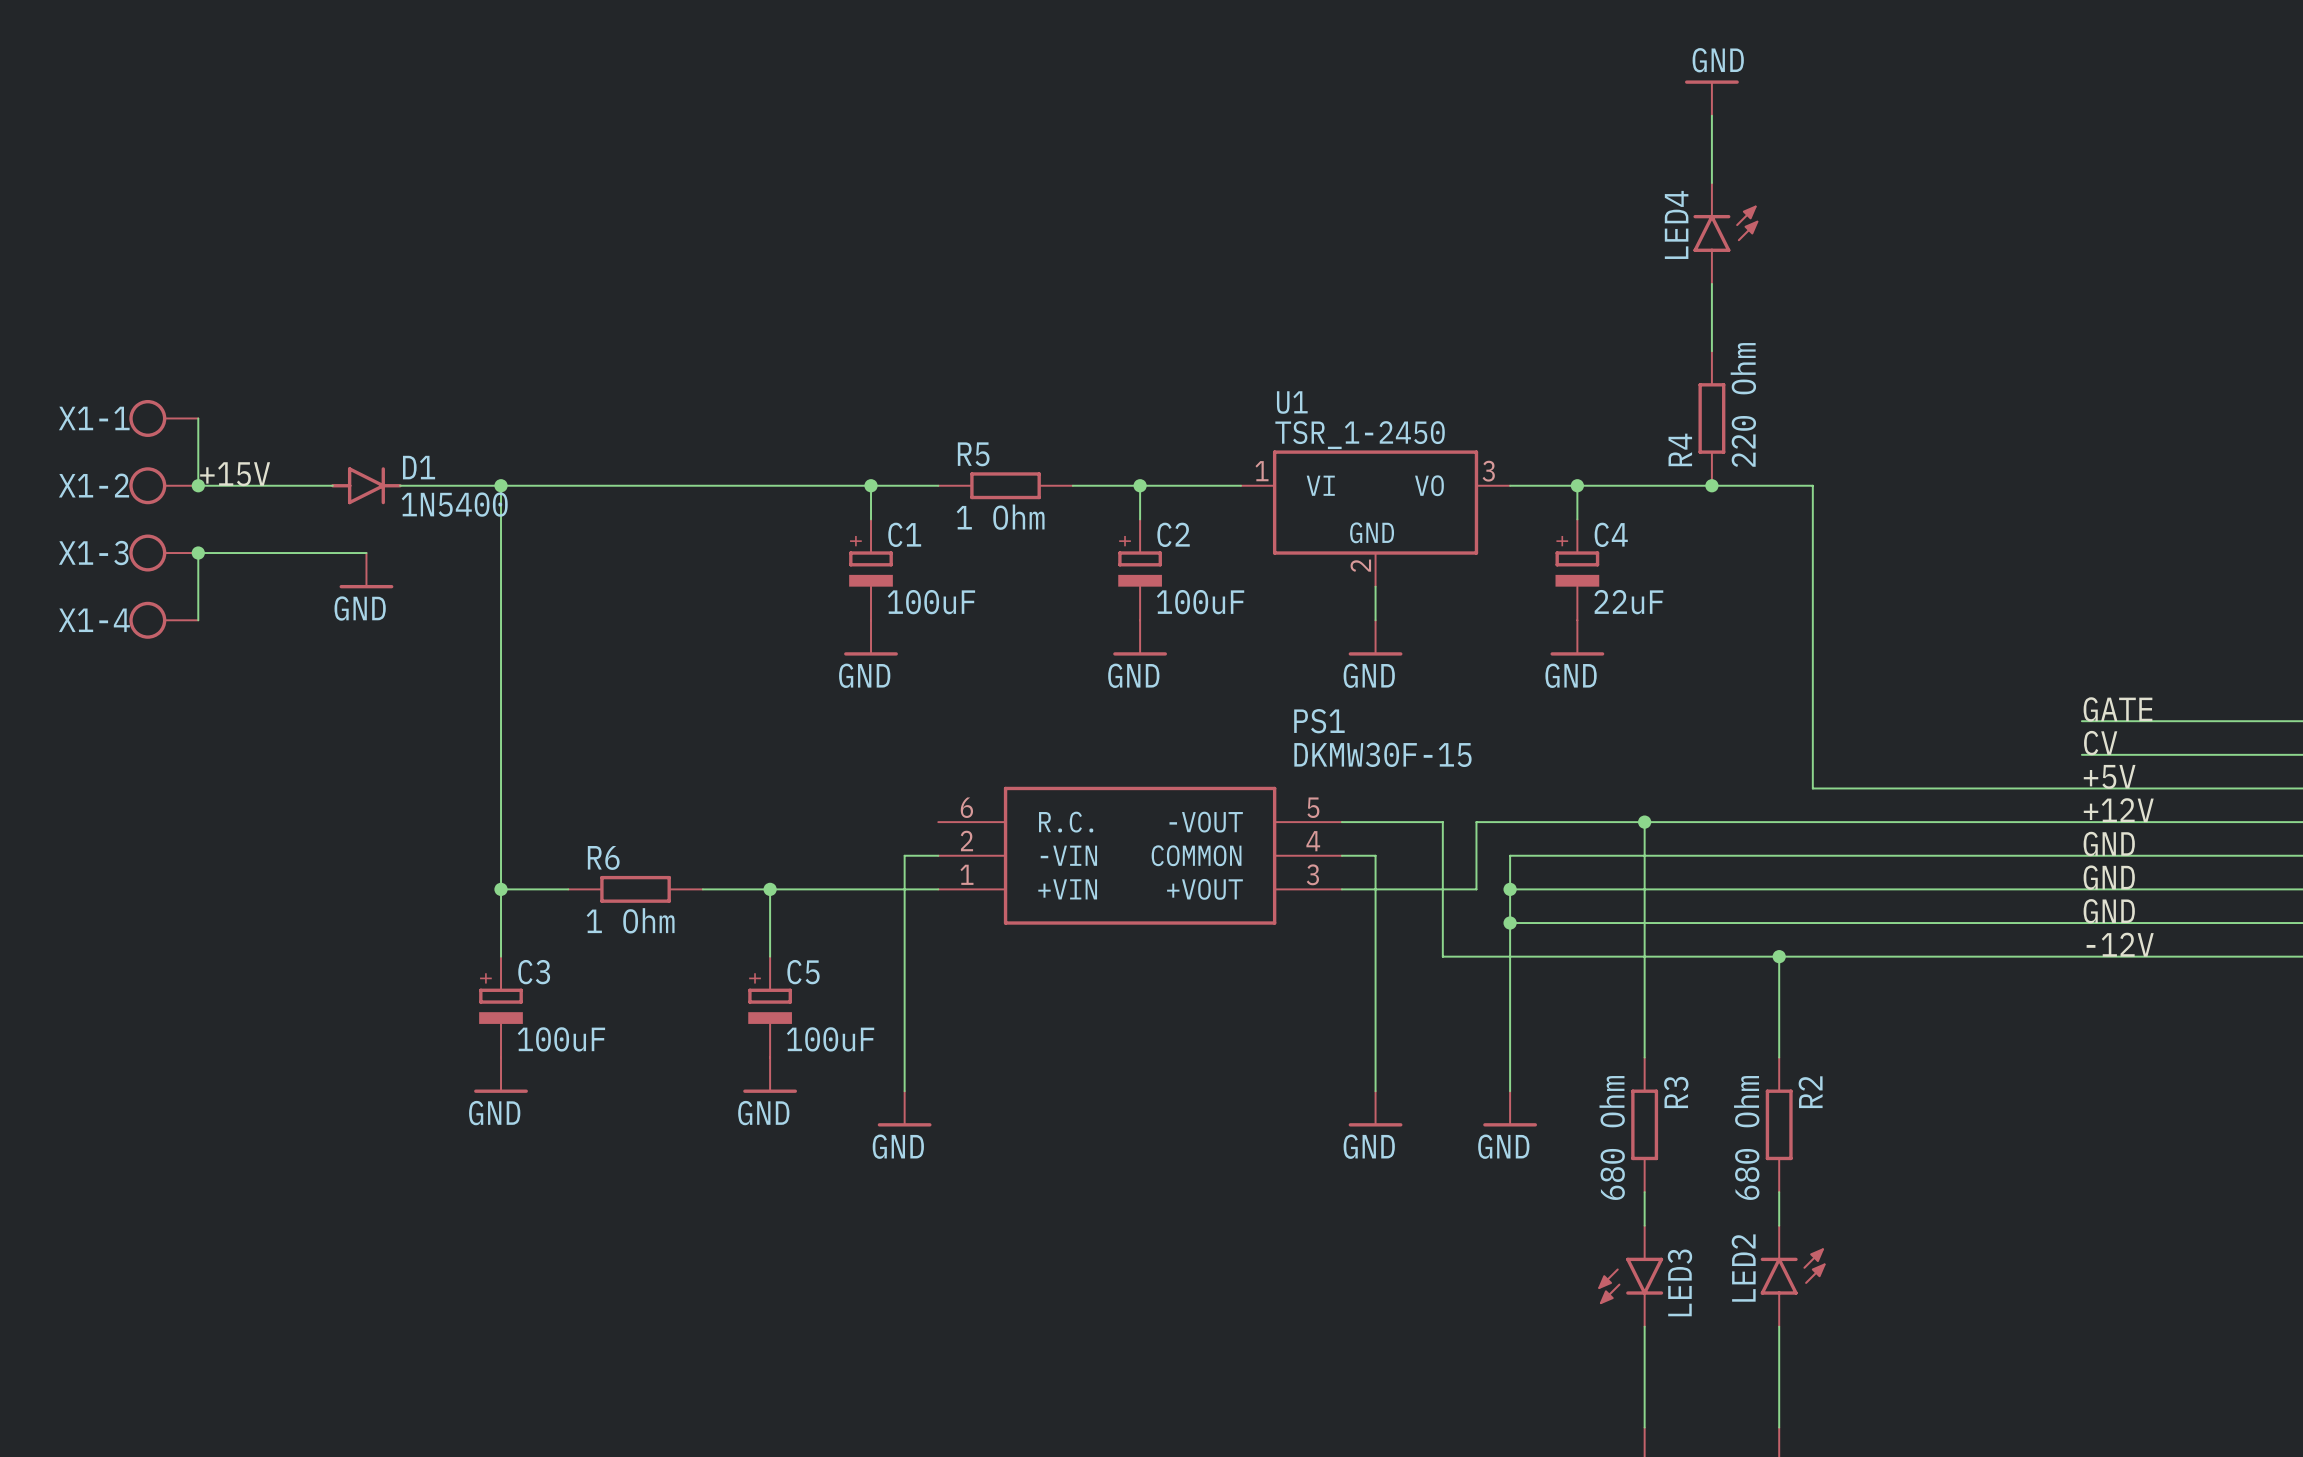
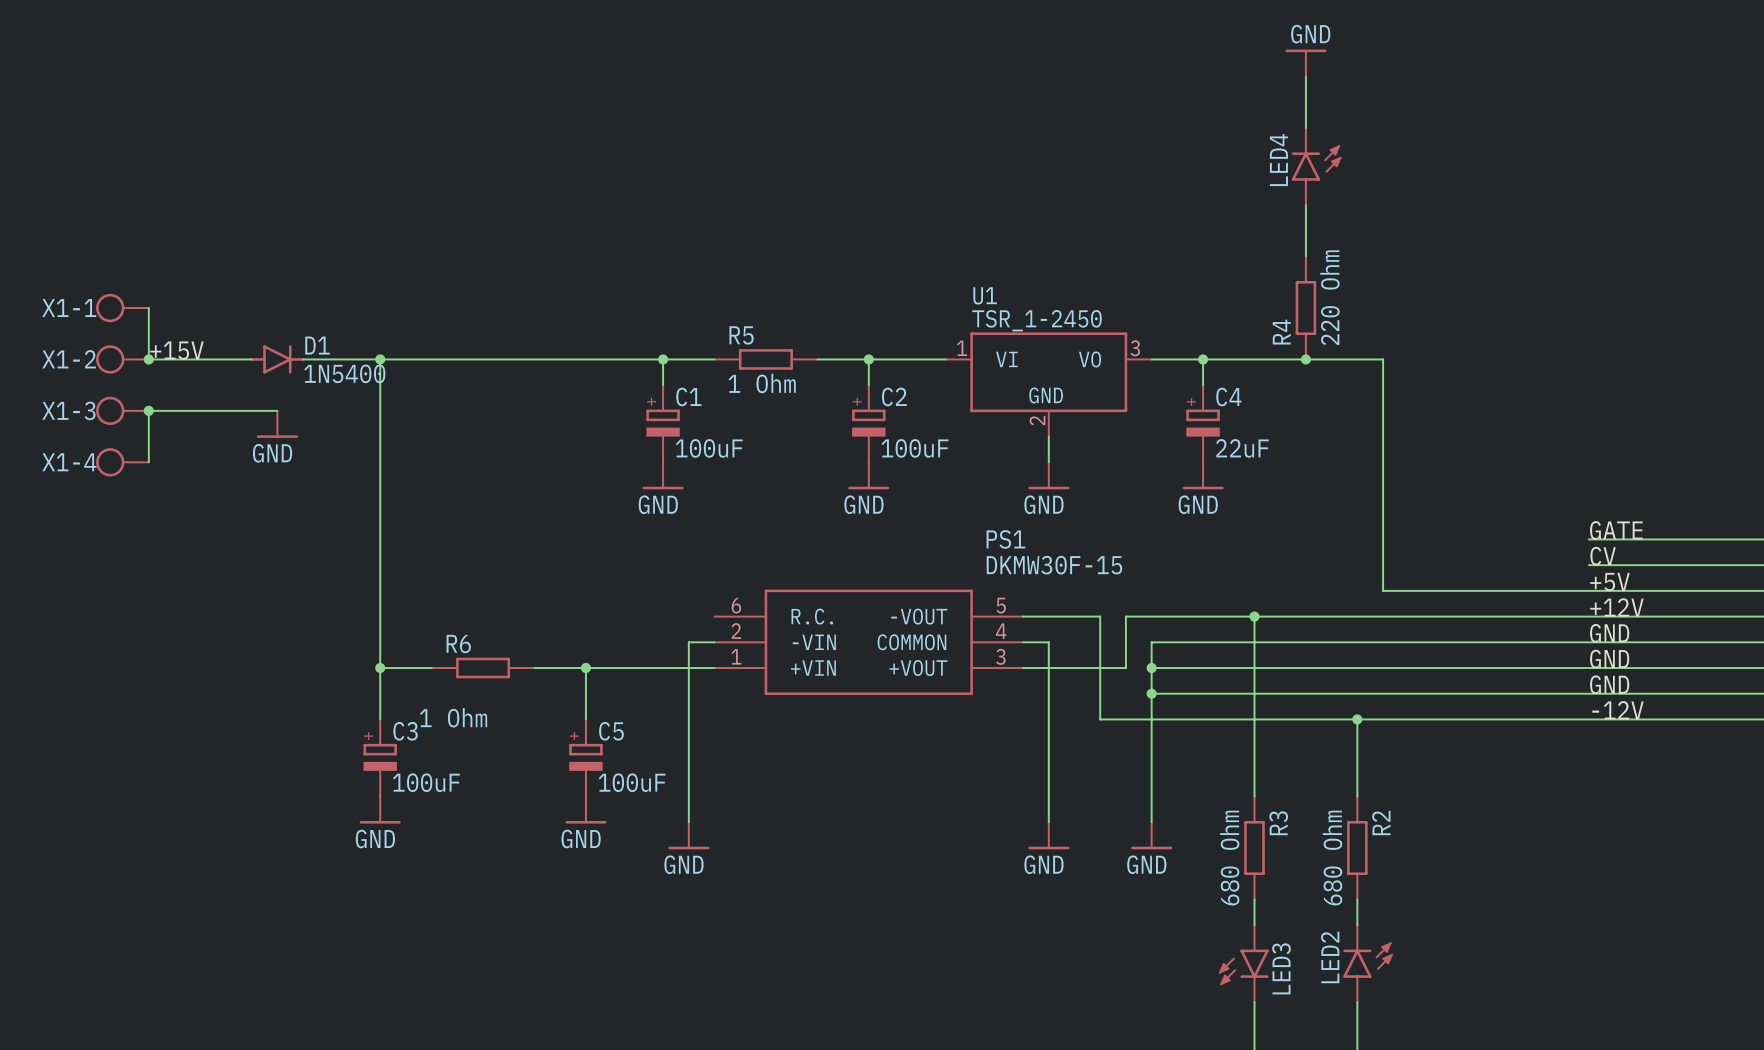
R6 value position: 1 Ohm (630, 920) -> 1 Ohm (453, 717)

